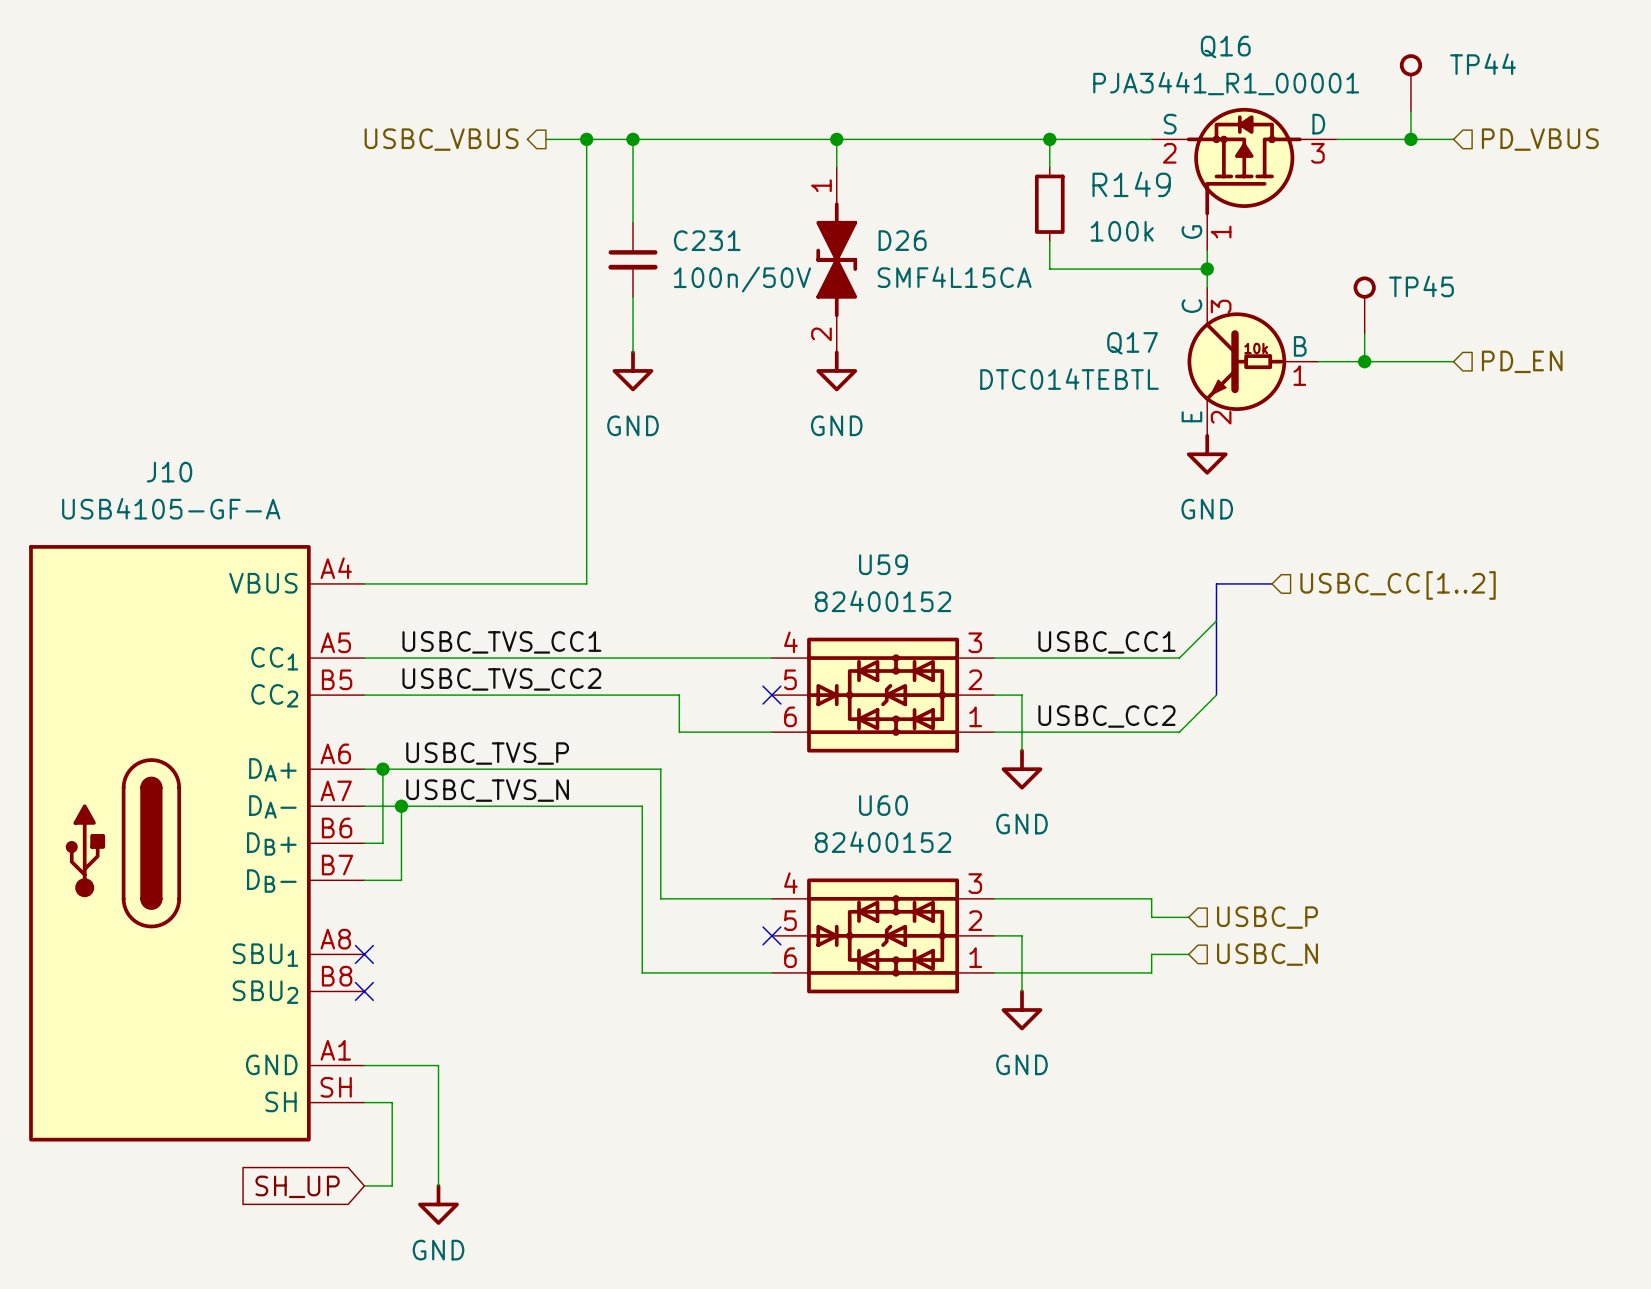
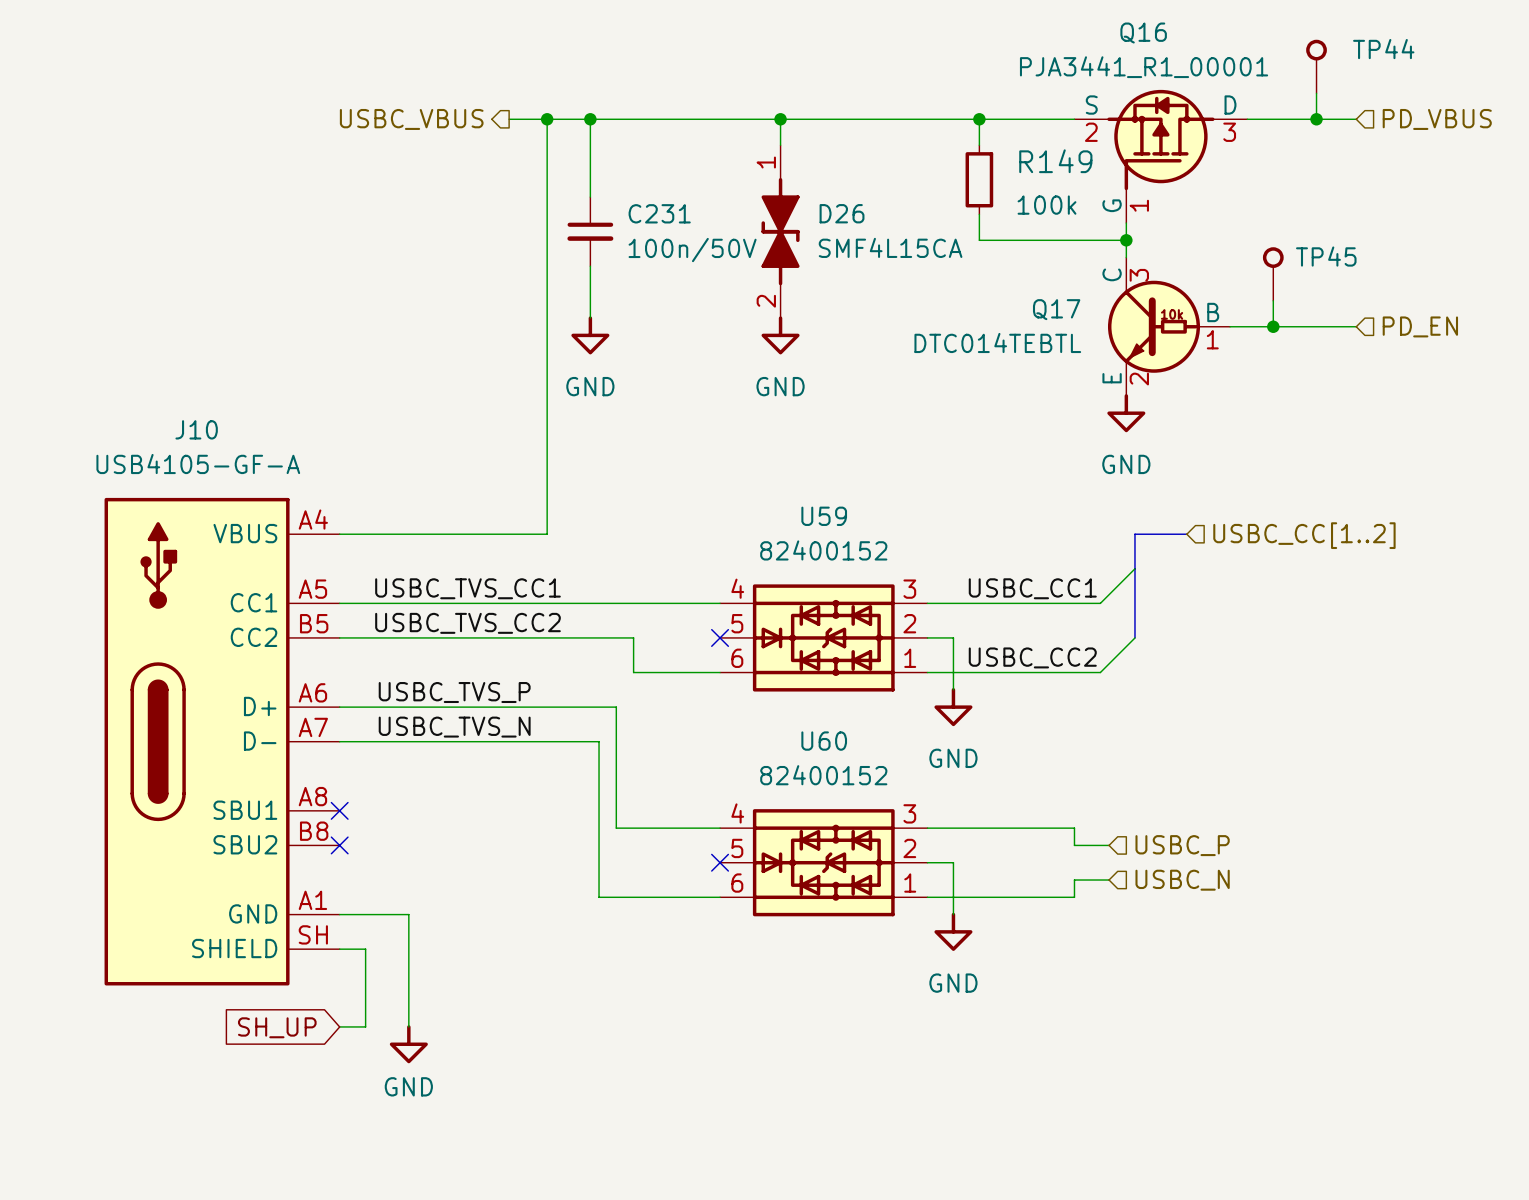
J10 name position: J10 (169, 472) -> J10 (196, 429)
J10 text position: USB4105-GF-A (171, 508) -> USB4105-GF-A (198, 464)
J10 symbol: [29, 545, 365, 1142] -> [104, 497, 340, 986]
wire: (382, 769) (382, 843) (364, 843) -> none
junction: (382, 769) -> none
wire: (401, 806) (401, 880) (364, 880) -> none
junction: (401, 806) -> none
no-connect mark: none -> (339, 810)
no-connect mark: none -> (339, 845)
no-connect mark: (364, 954) -> none
no-connect mark: (364, 991) -> none
wire: (364, 1065) (438, 1065) -> (339, 914) (408, 914) (408, 983)
wire: (364, 1102) (392, 1102) -> (339, 949) (365, 949) (365, 1018)
wire: (392, 1111) (392, 1185) (364, 1185) -> (365, 1026) (339, 1026)
wire: (438, 1111) (438, 1185) -> none
global label position: SH_UP (297, 1186) -> SH_UP (277, 1027)
power symbol position: GND (438, 1204) -> GND (408, 1044)

